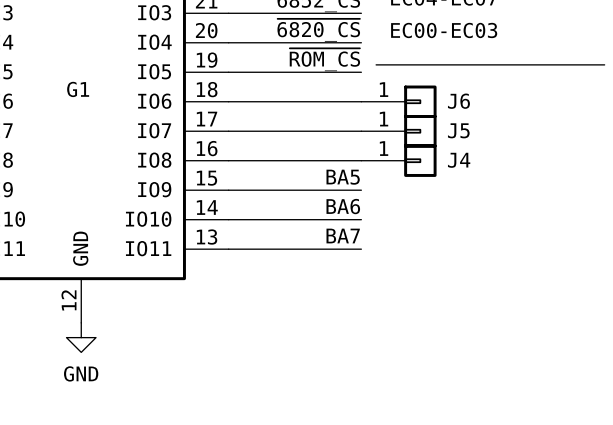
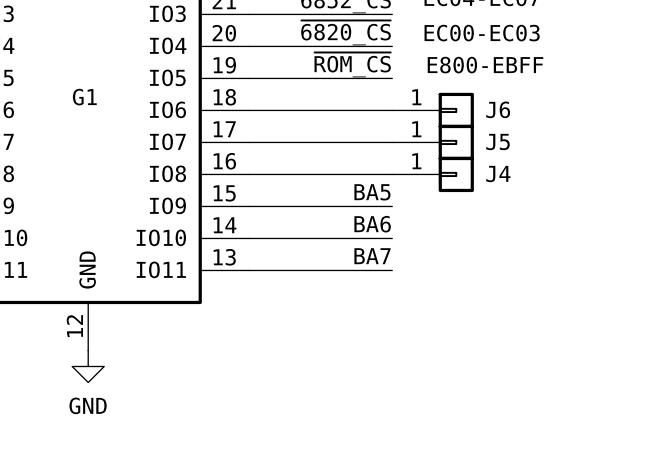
text: none -> E800-EBFF (485, 65)
line: (376, 64) (604, 64) -> none

